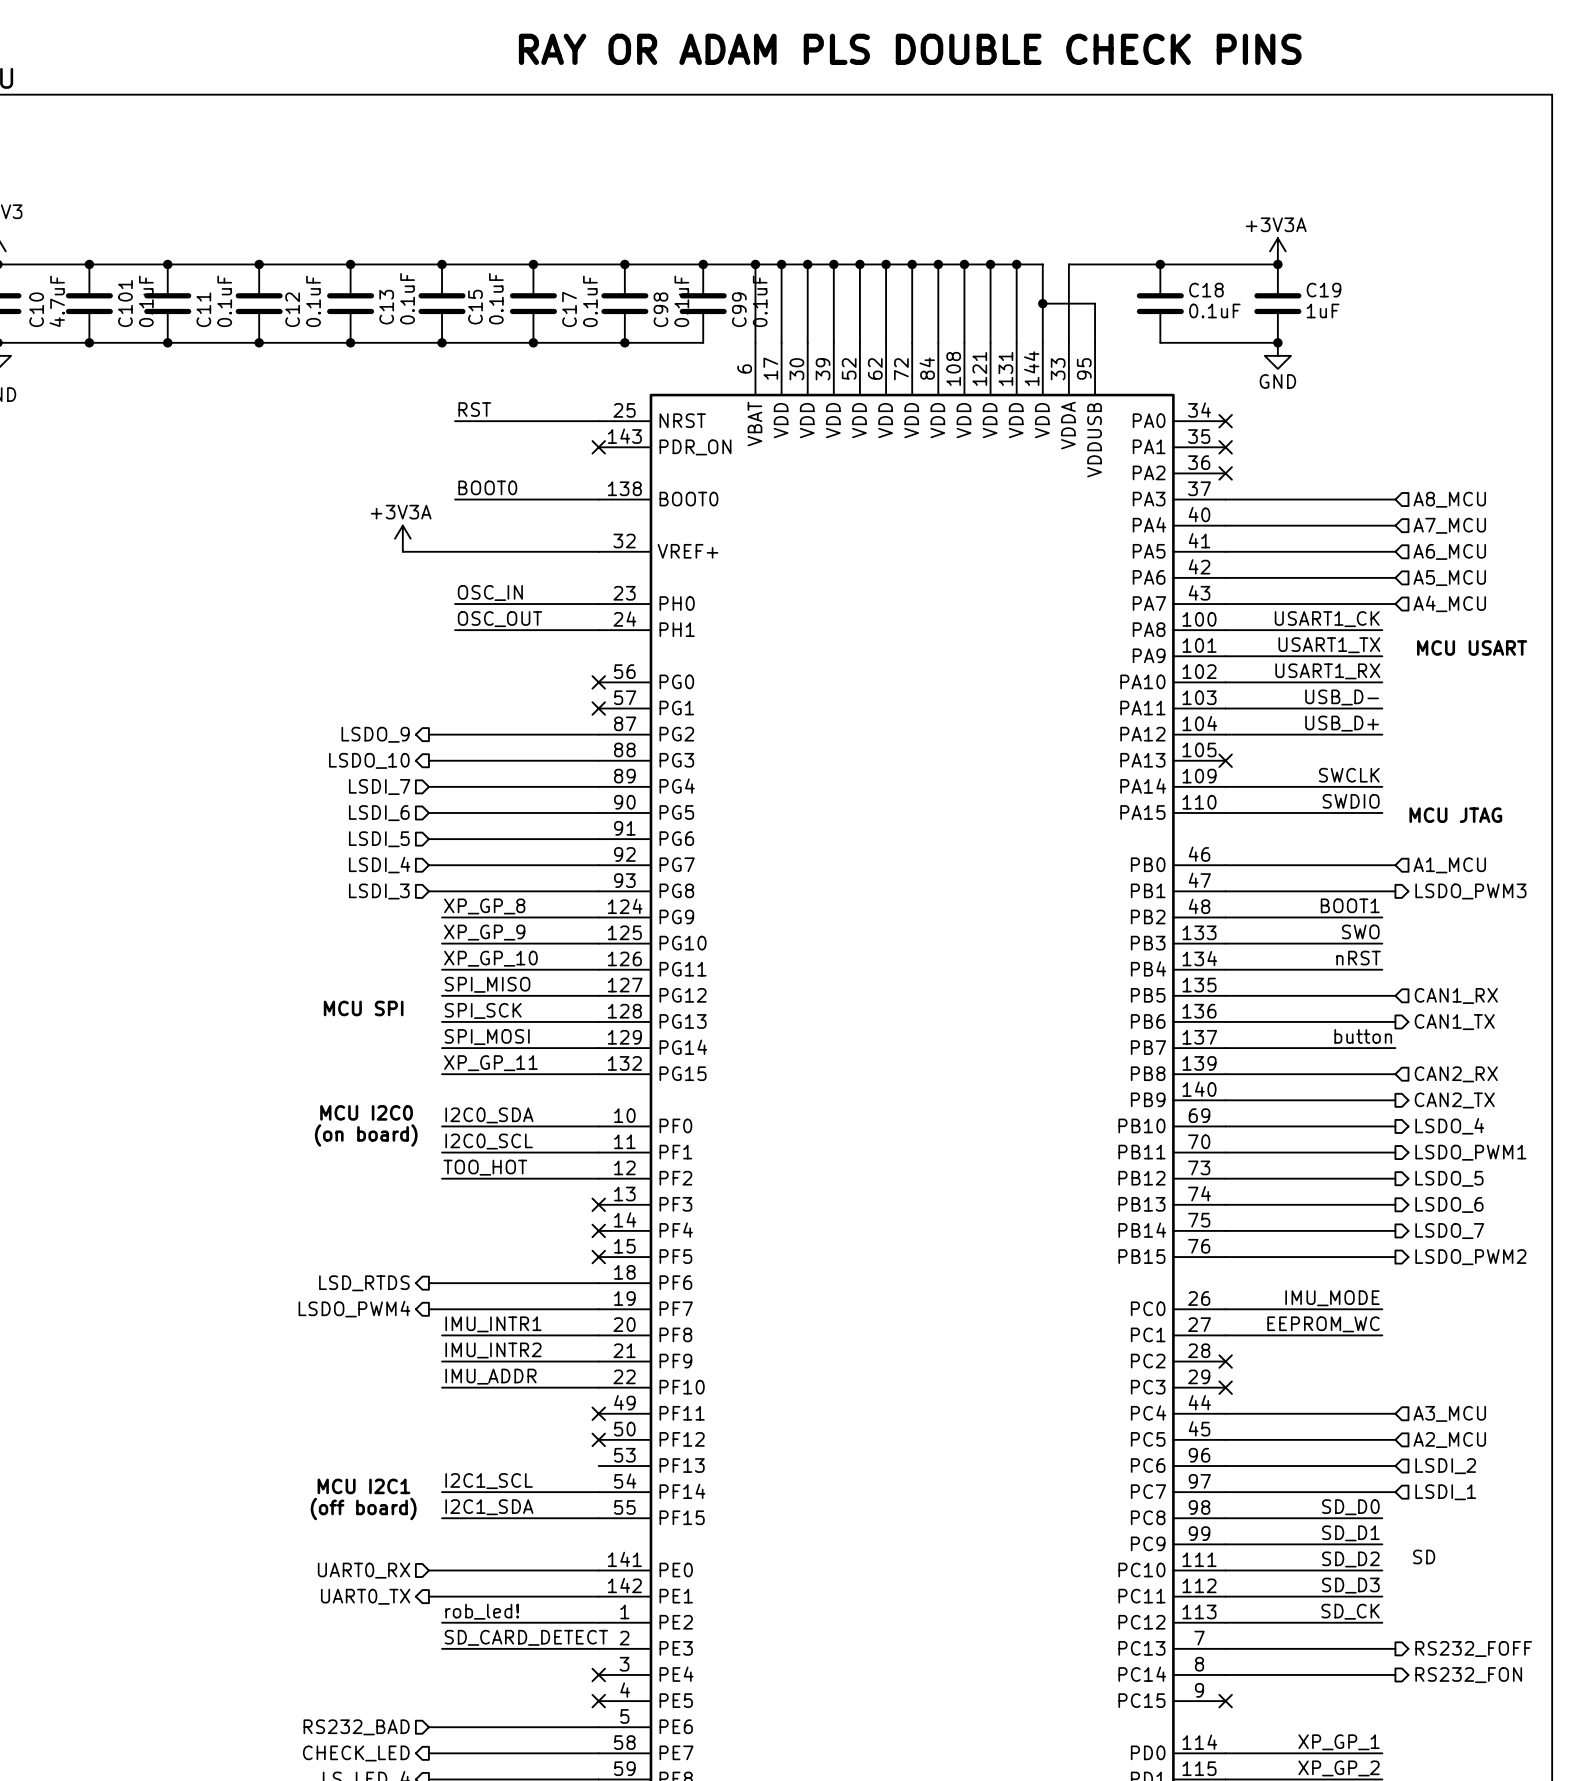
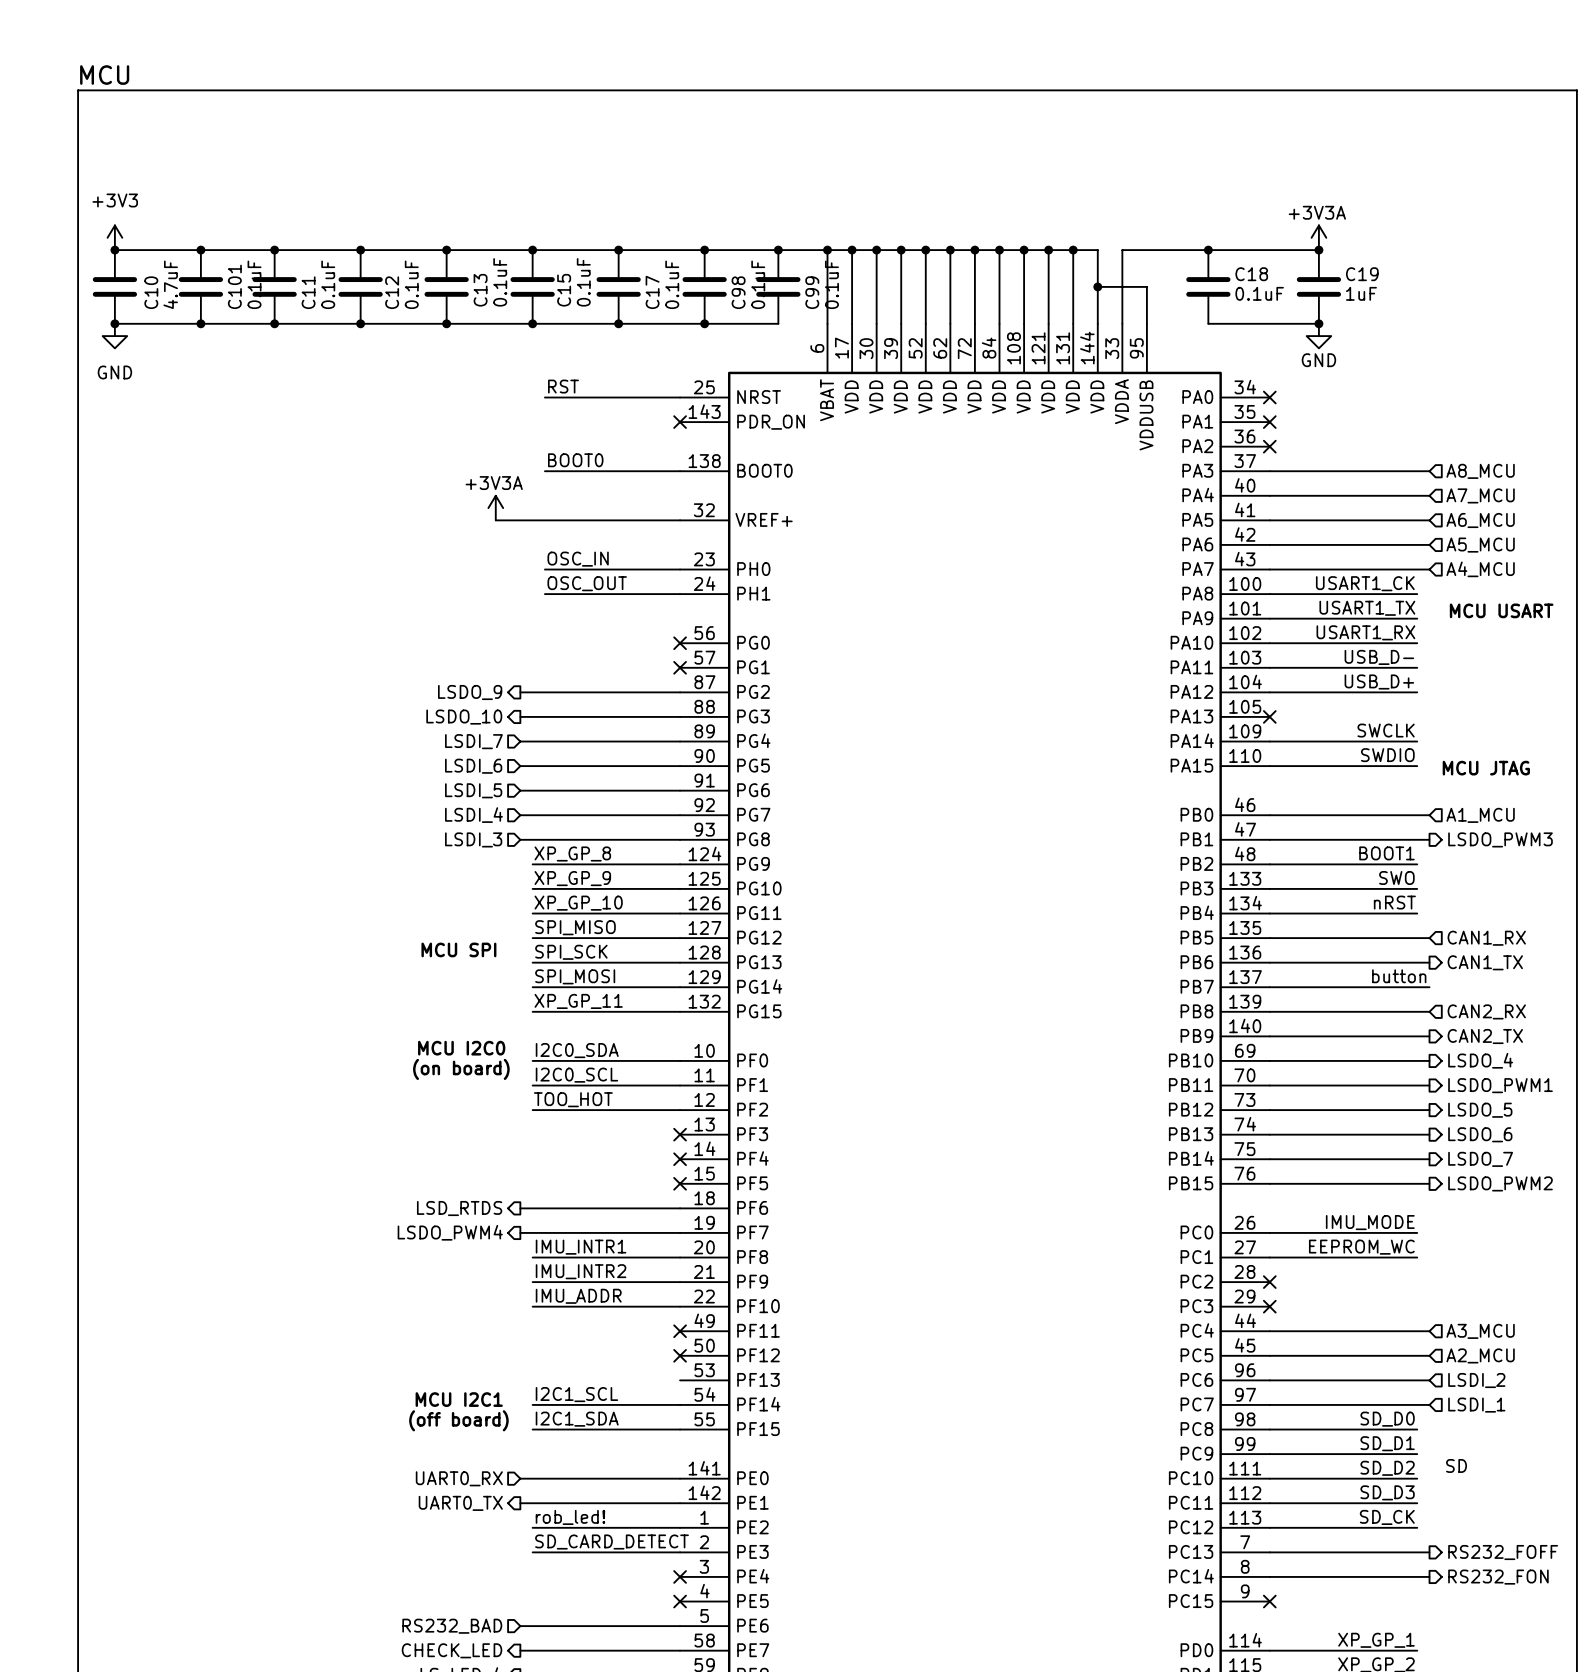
text: RAY OR ADAM PLS DOUBLE CHECK PINS (910, 49) -> none

